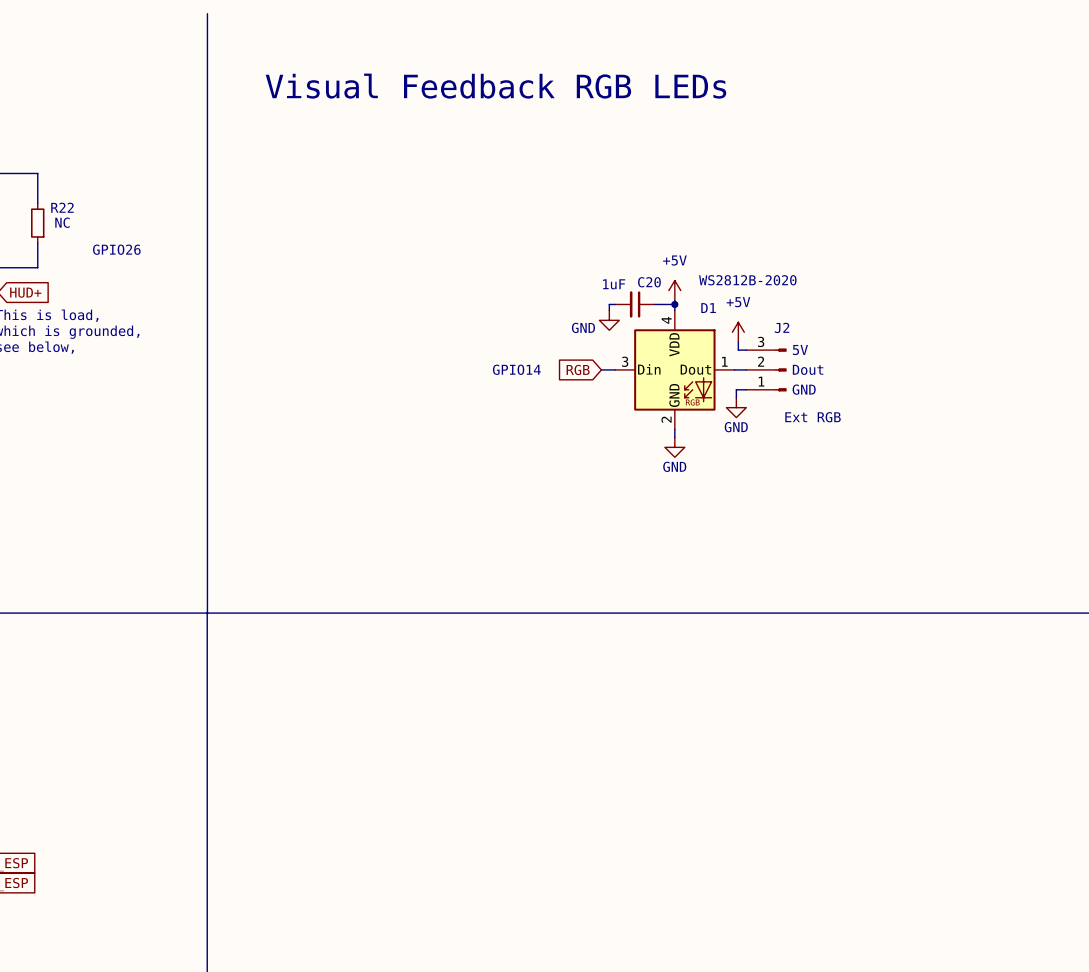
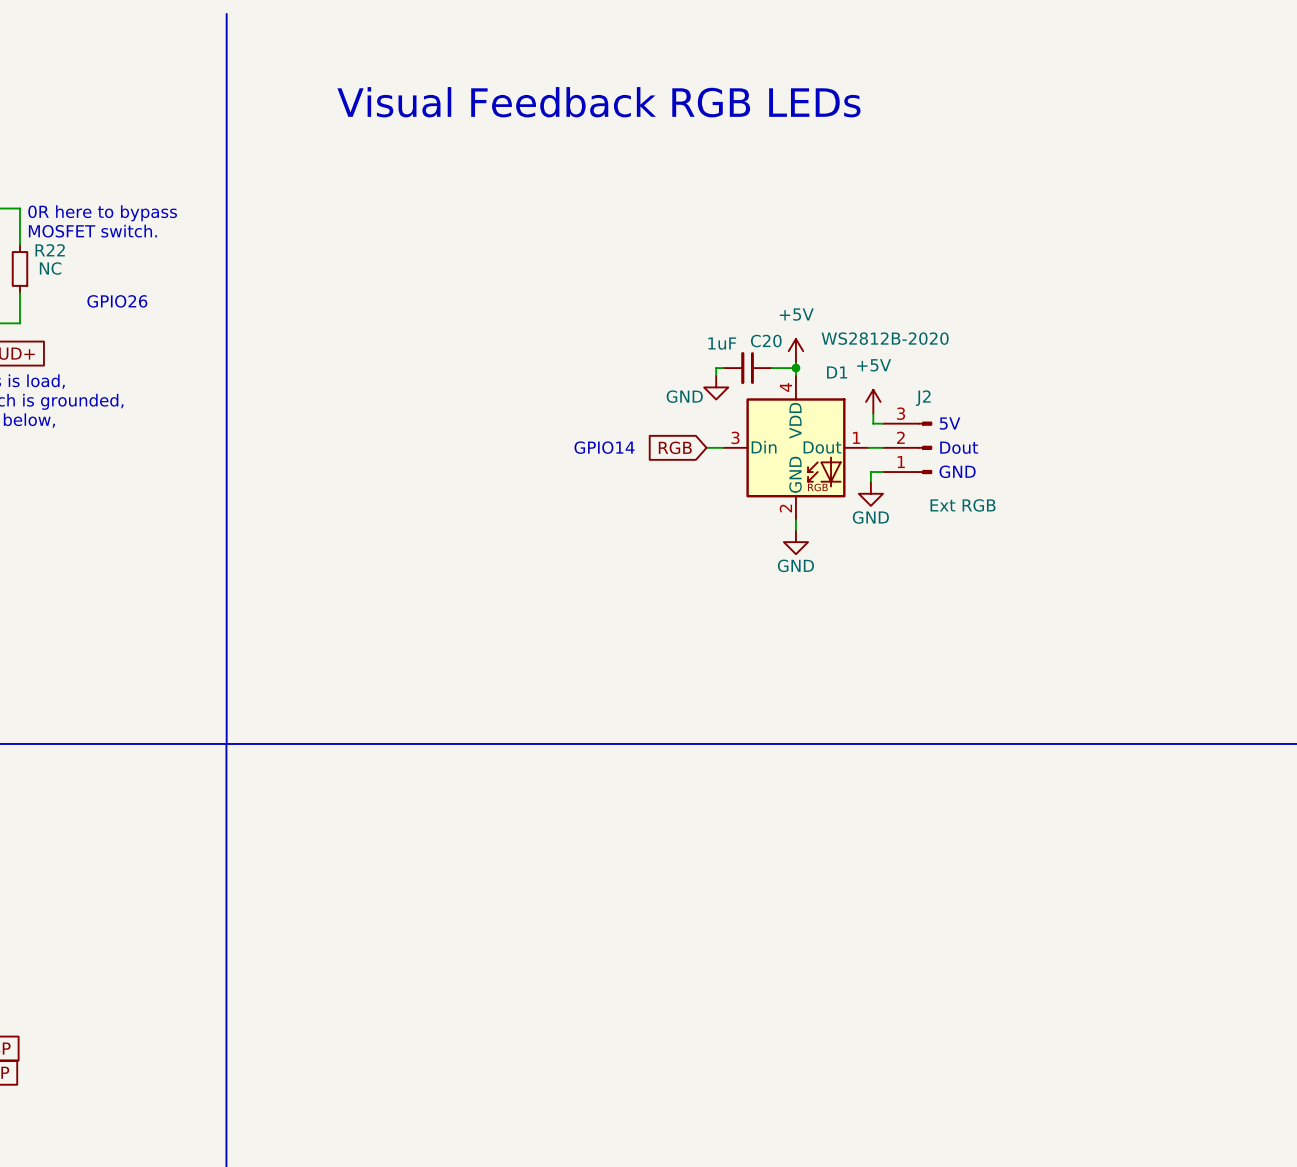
text: none -> 0R here to bypass (102, 213)
text: none -> MOSFET switch. (92, 231)

